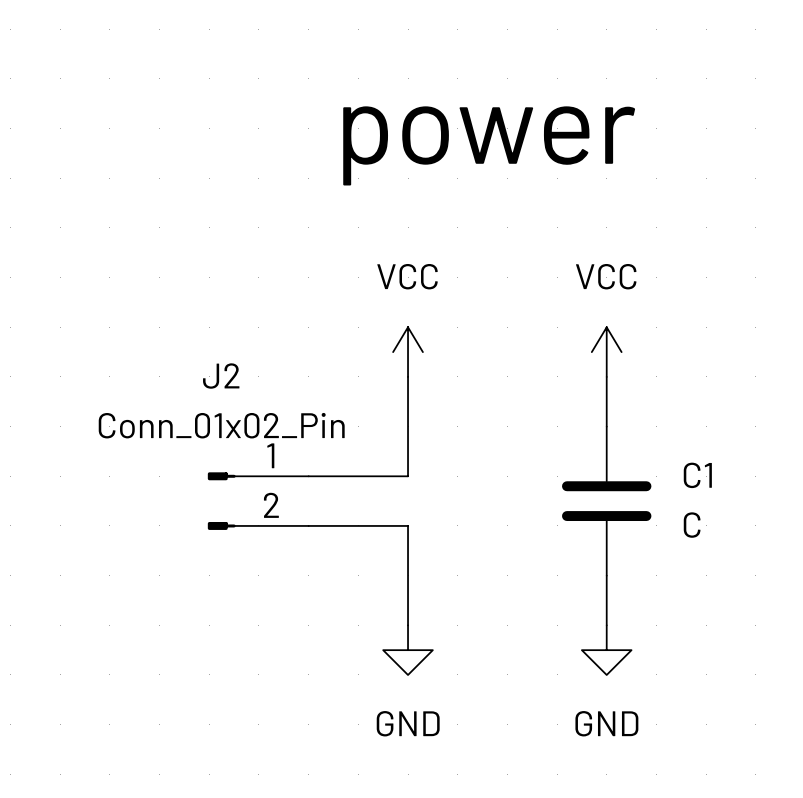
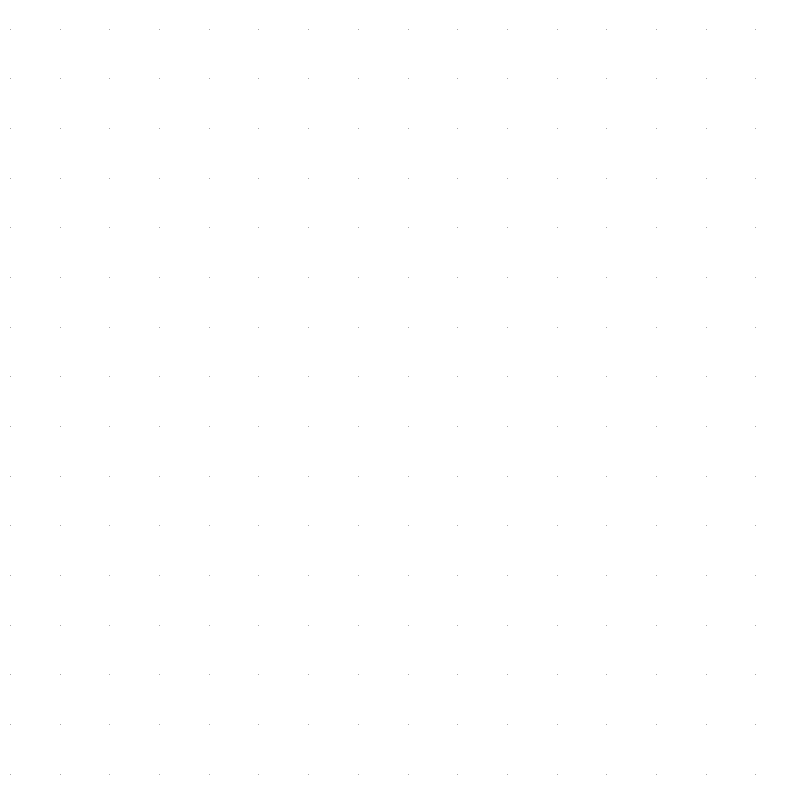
text: power (489, 145) -> none
power symbol: VCC (408, 352) -> none
power symbol: VCC (606, 352) -> none
wire: (408, 376) (408, 476) (308, 476) -> none
wire: (606, 376) (606, 426) -> none
J2: Conn_01x02_Pin (258, 501) -> none
C1: C (606, 501) -> none
wire: (308, 525) (408, 525) (408, 625) -> none
wire: (606, 575) (606, 625) -> none
power symbol: GND (408, 650) -> none
power symbol: GND (606, 650) -> none

